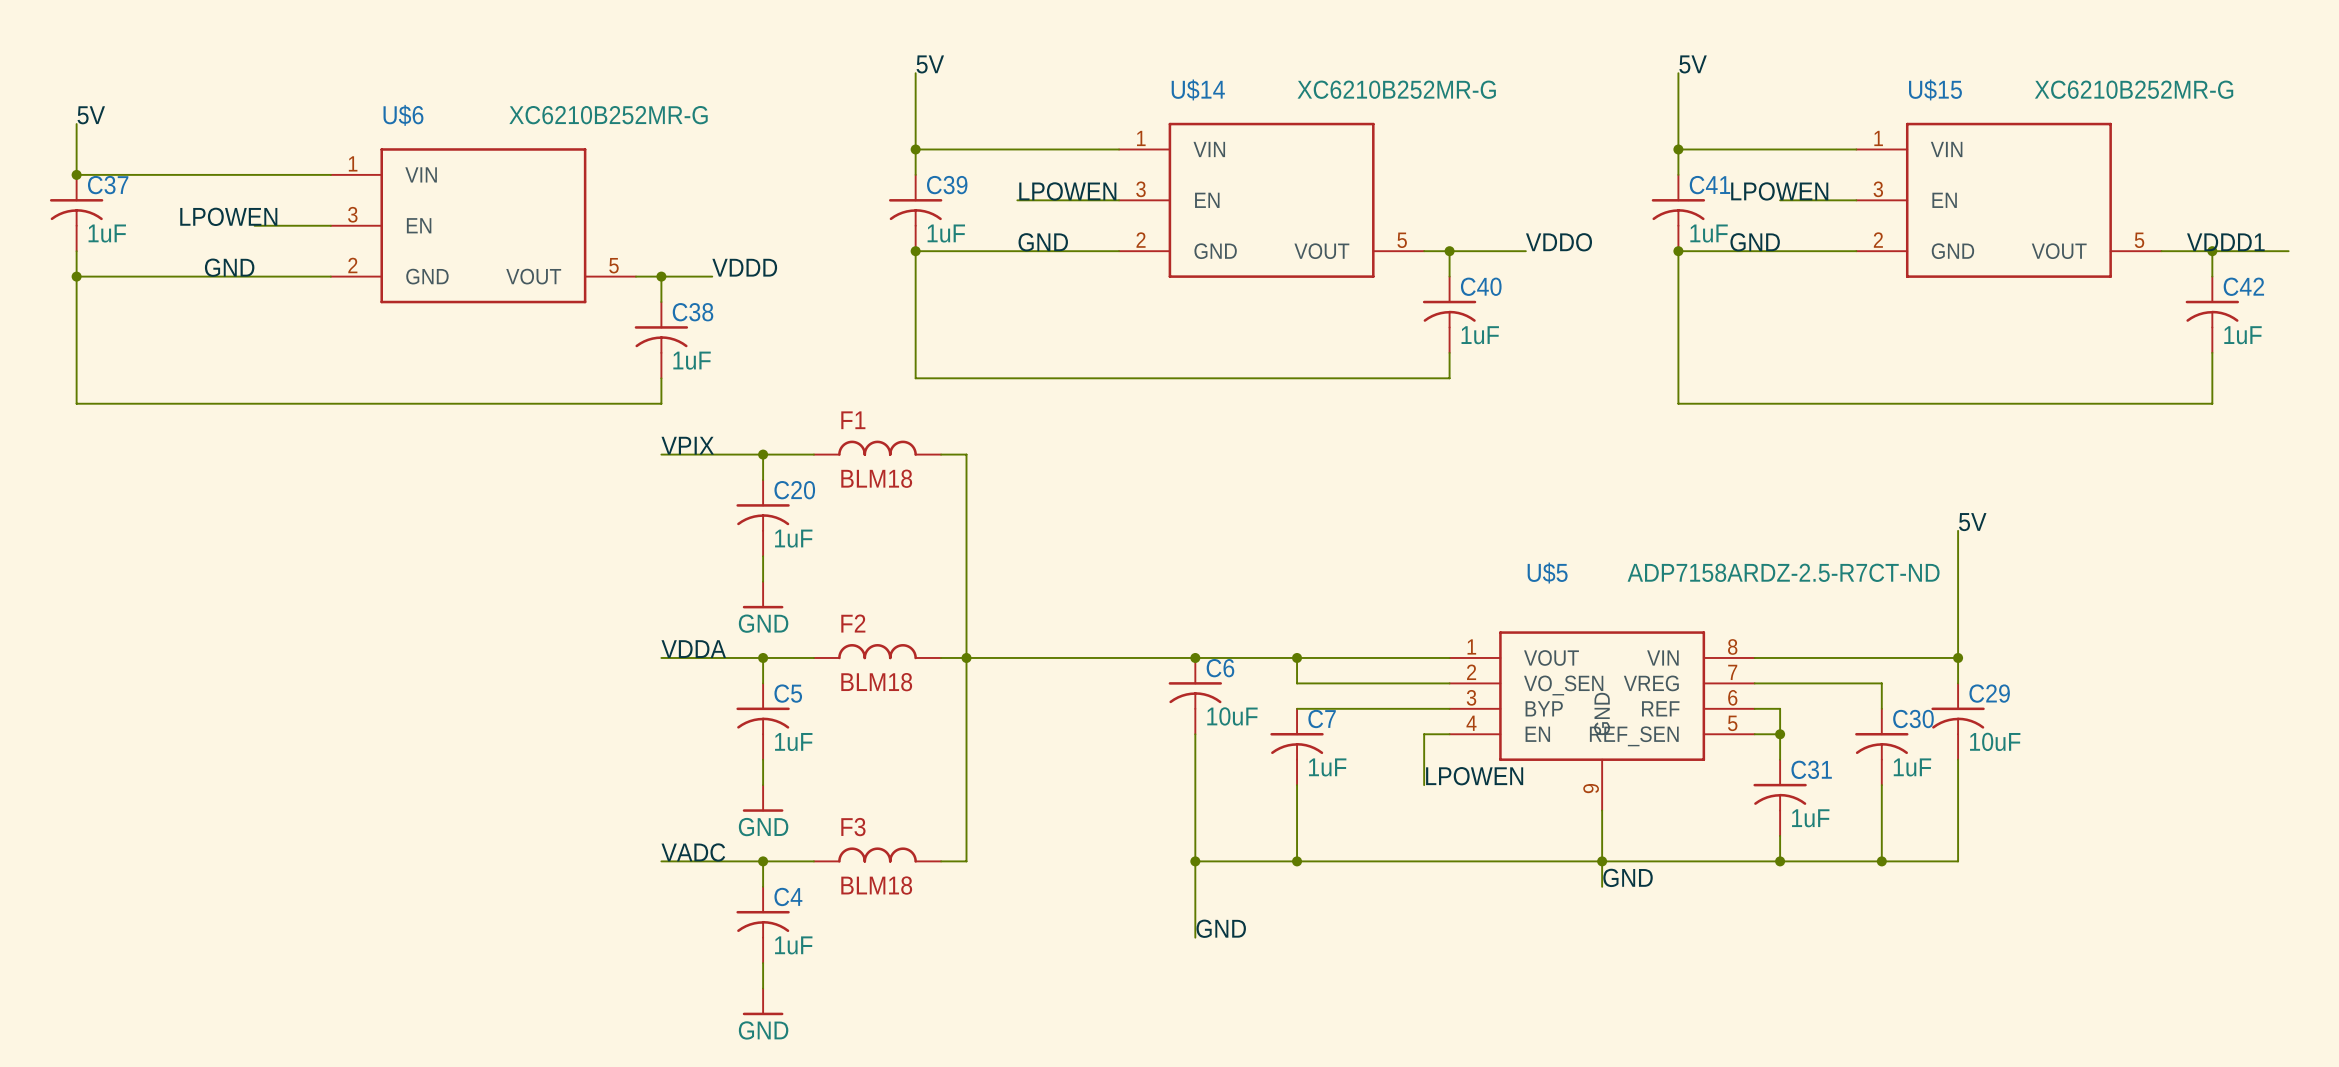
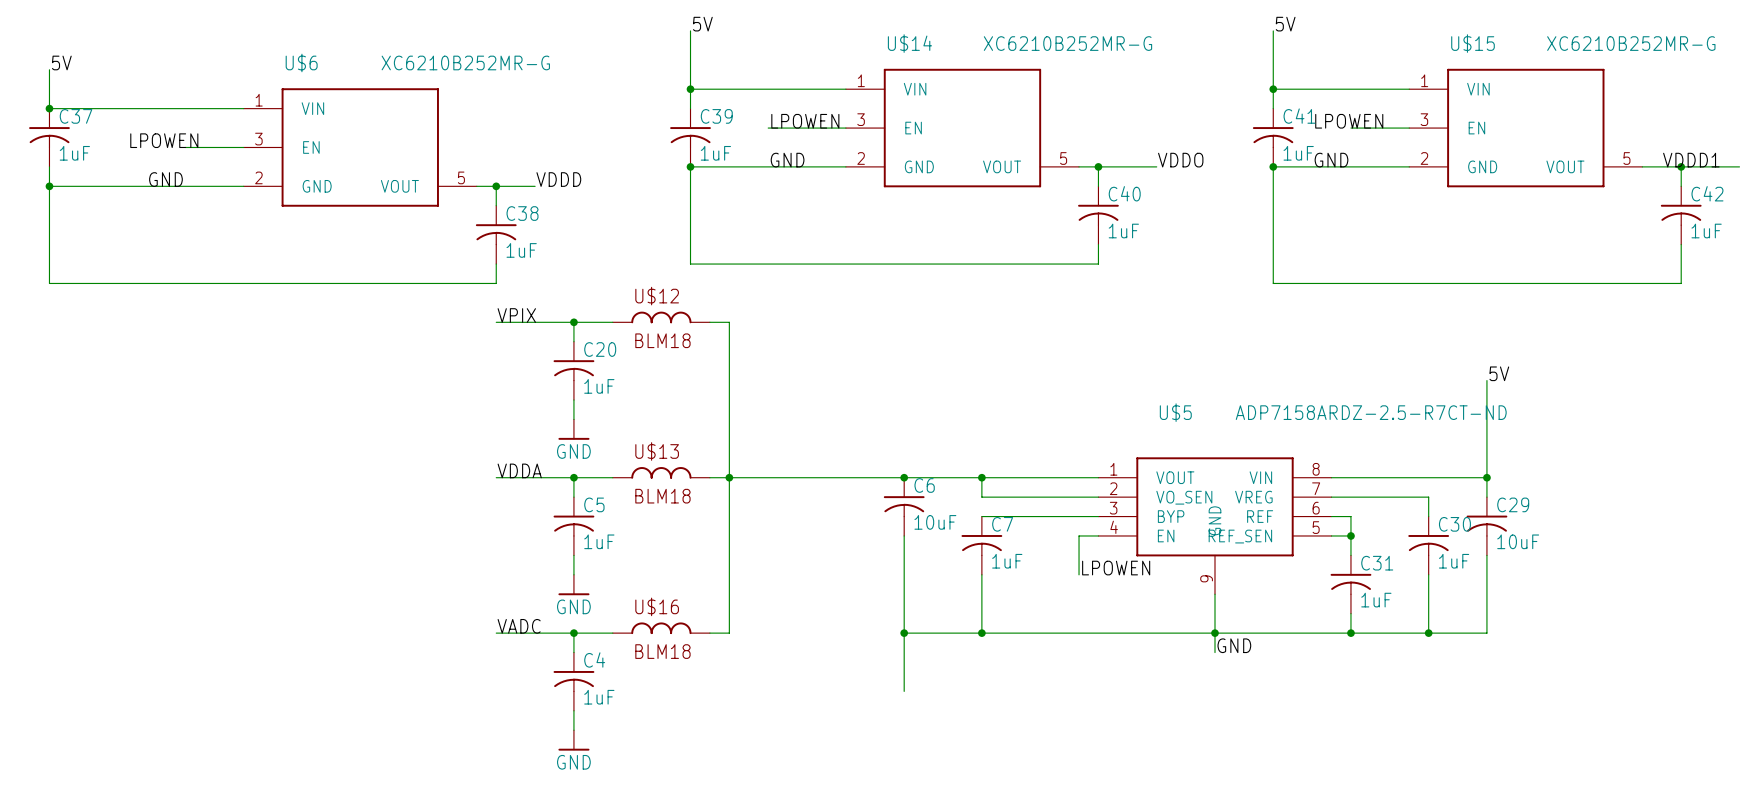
F1 name: F1 (853, 420) -> U$12 (657, 296)
F2 name: F2 (853, 623) -> U$13 (657, 451)
F3 name: F3 (853, 827) -> U$16 (657, 606)
label: GND (1221, 928) -> none

